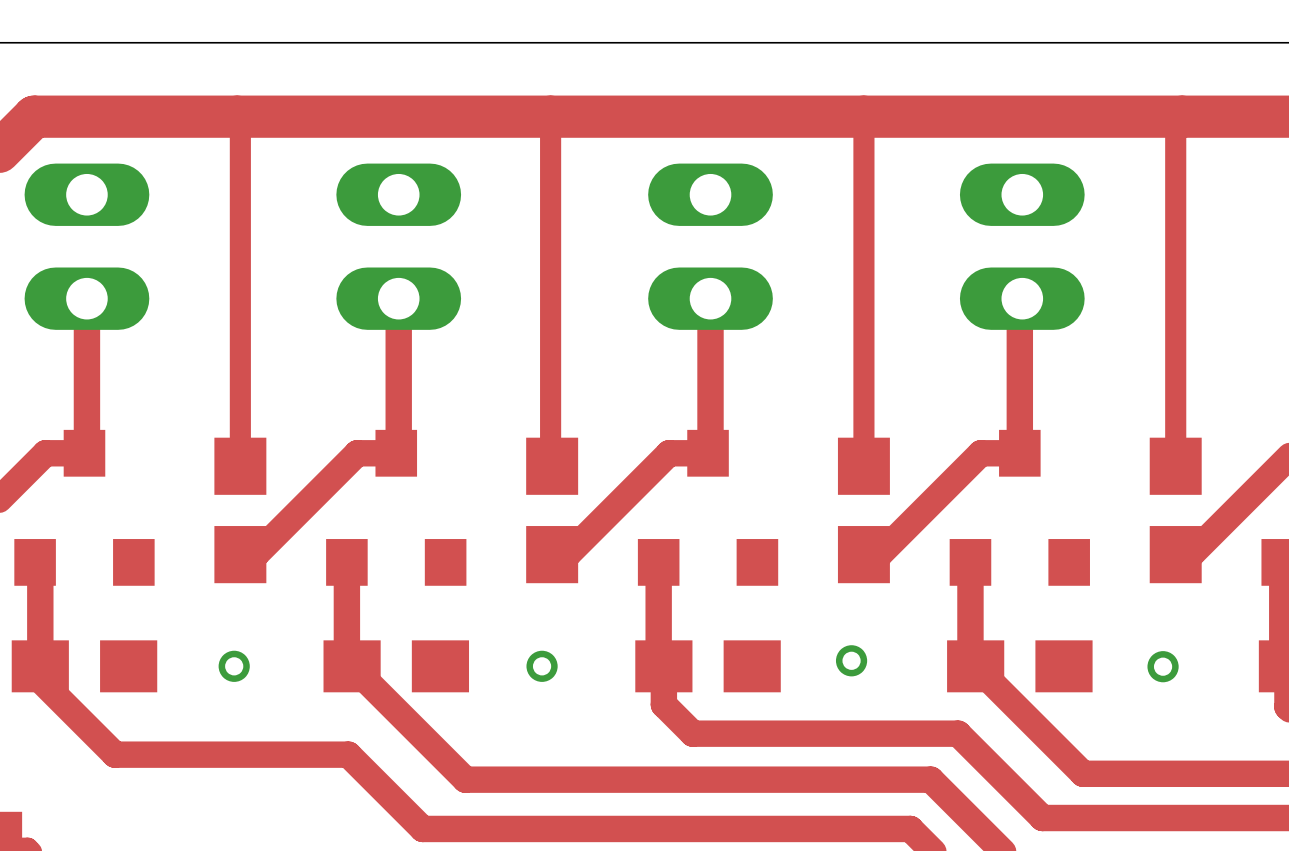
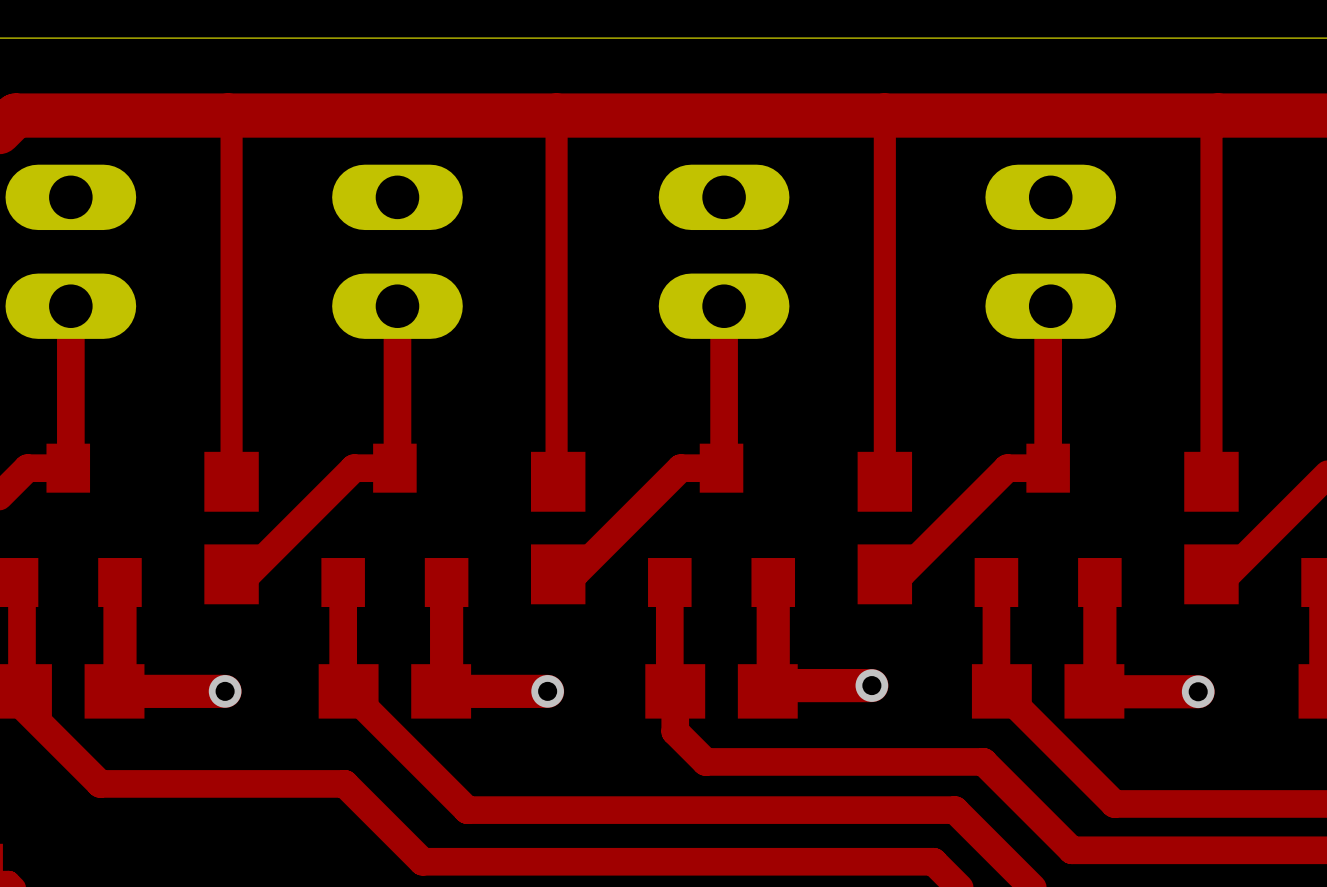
top track: none -> (119, 582) (119, 685) (114, 691) (225, 691)
top track: none -> (446, 582) (446, 685) (441, 691) (547, 691)
top track: none -> (773, 582) (773, 685)
top track: none -> (1099, 582) (1099, 686) (1094, 691) (1198, 691)
top track: none -> (871, 685) (773, 685) (767, 691)

